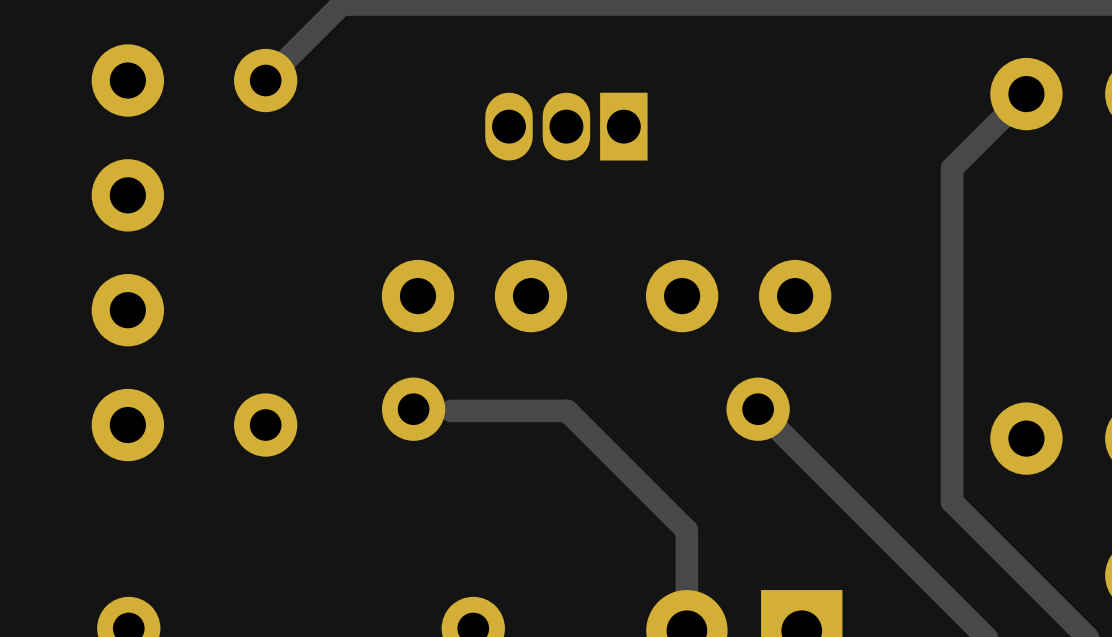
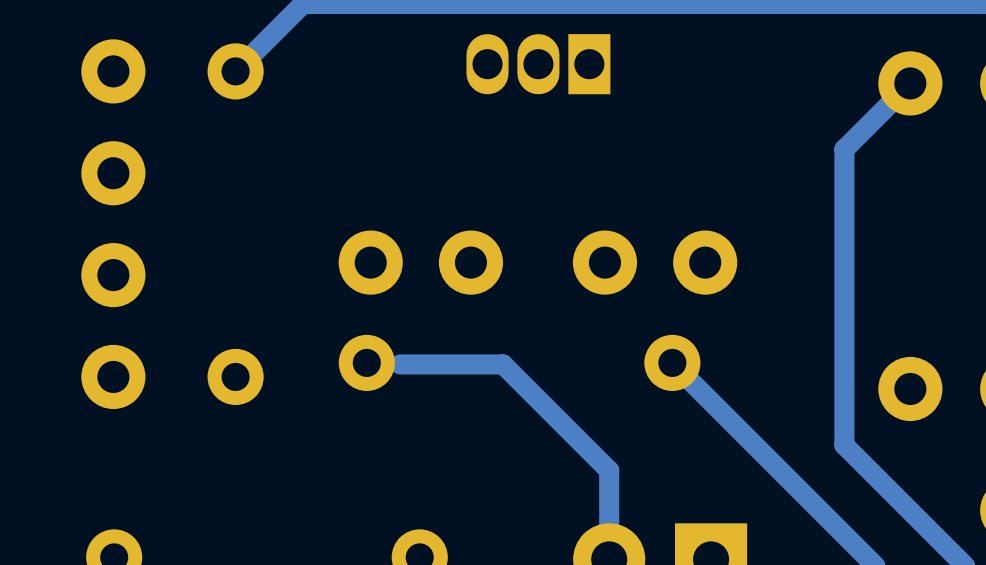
part position: (566, 126) -> (538, 64)

